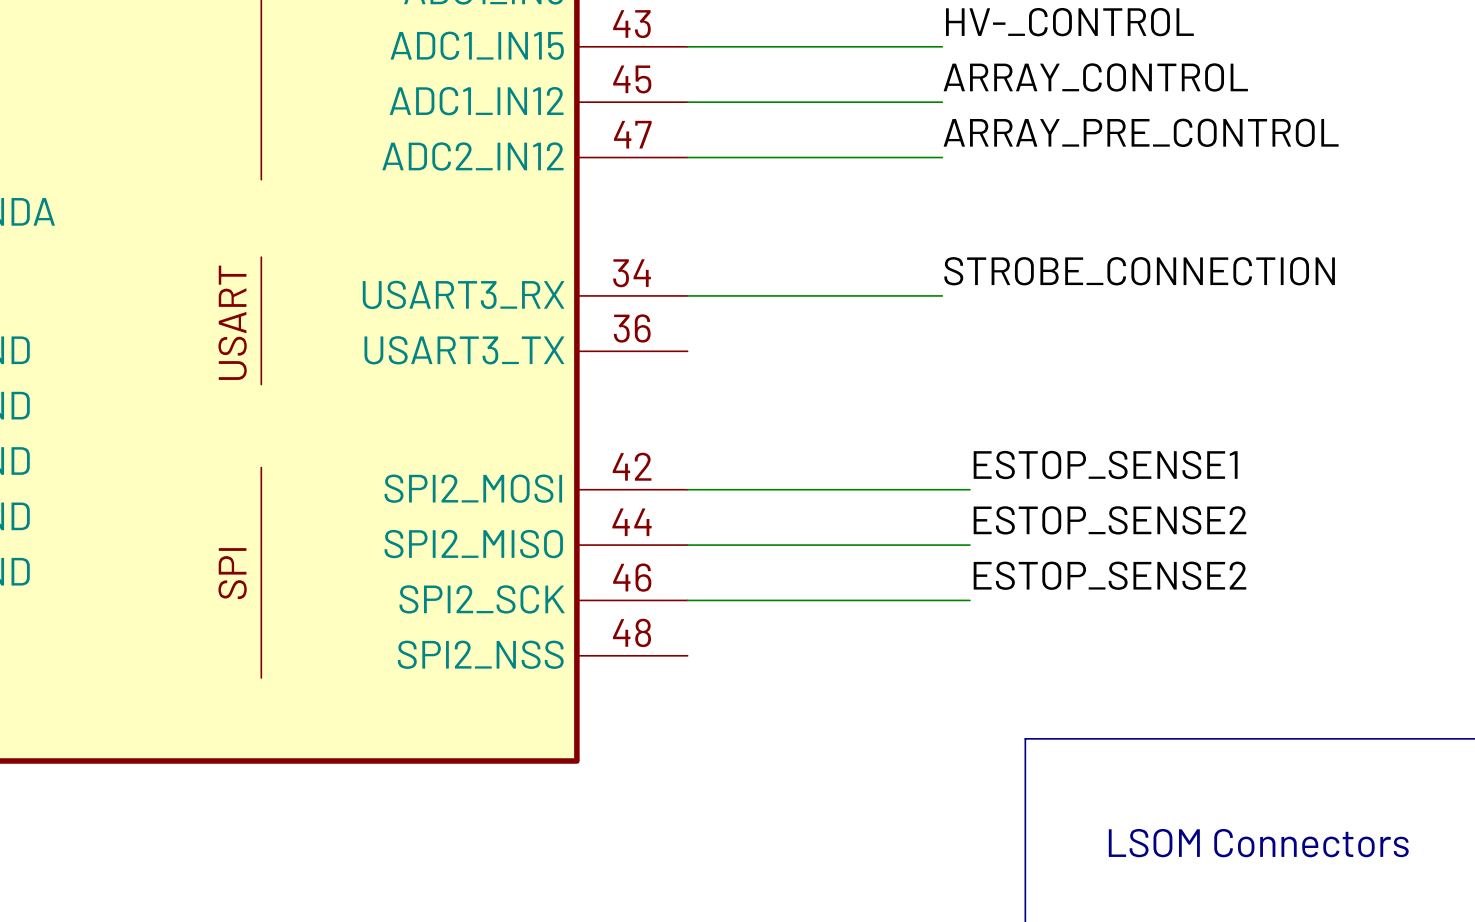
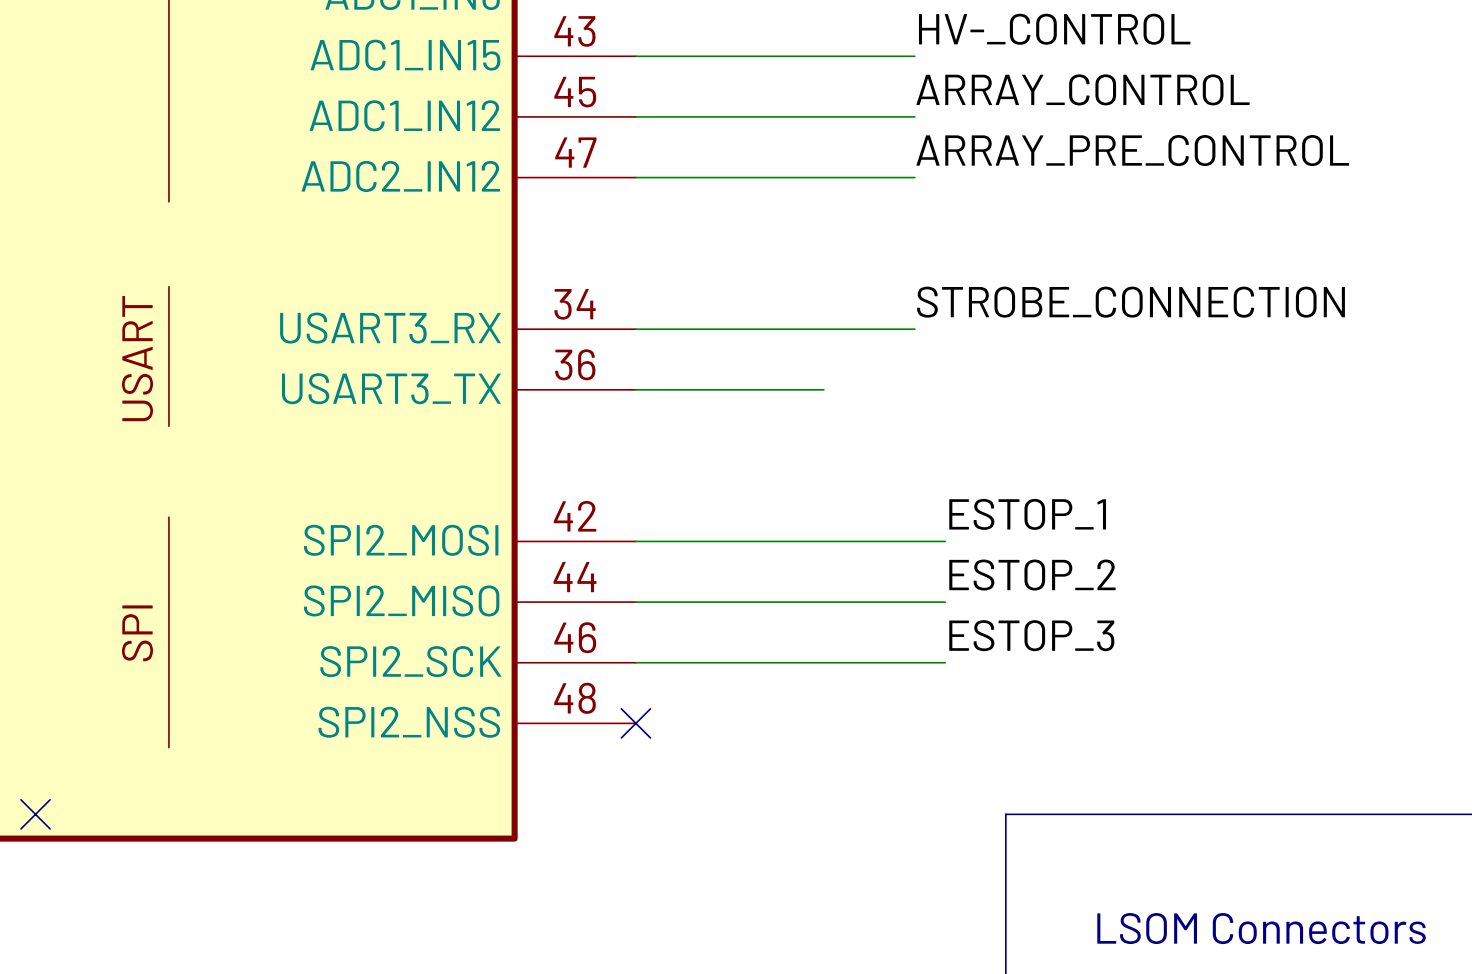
wire: none -> (635, 389) (823, 389)
label: ESTOP_SENSE1 (1105, 465) -> ESTOP_1 (1027, 514)
label: ESTOP_SENSE2 (1110, 520) -> ESTOP_2 (1032, 575)
label: ESTOP_SENSE2 (1110, 575) -> ESTOP_3 (1031, 635)
no-connect mark: none -> (635, 723)
no-connect mark: none -> (35, 814)

